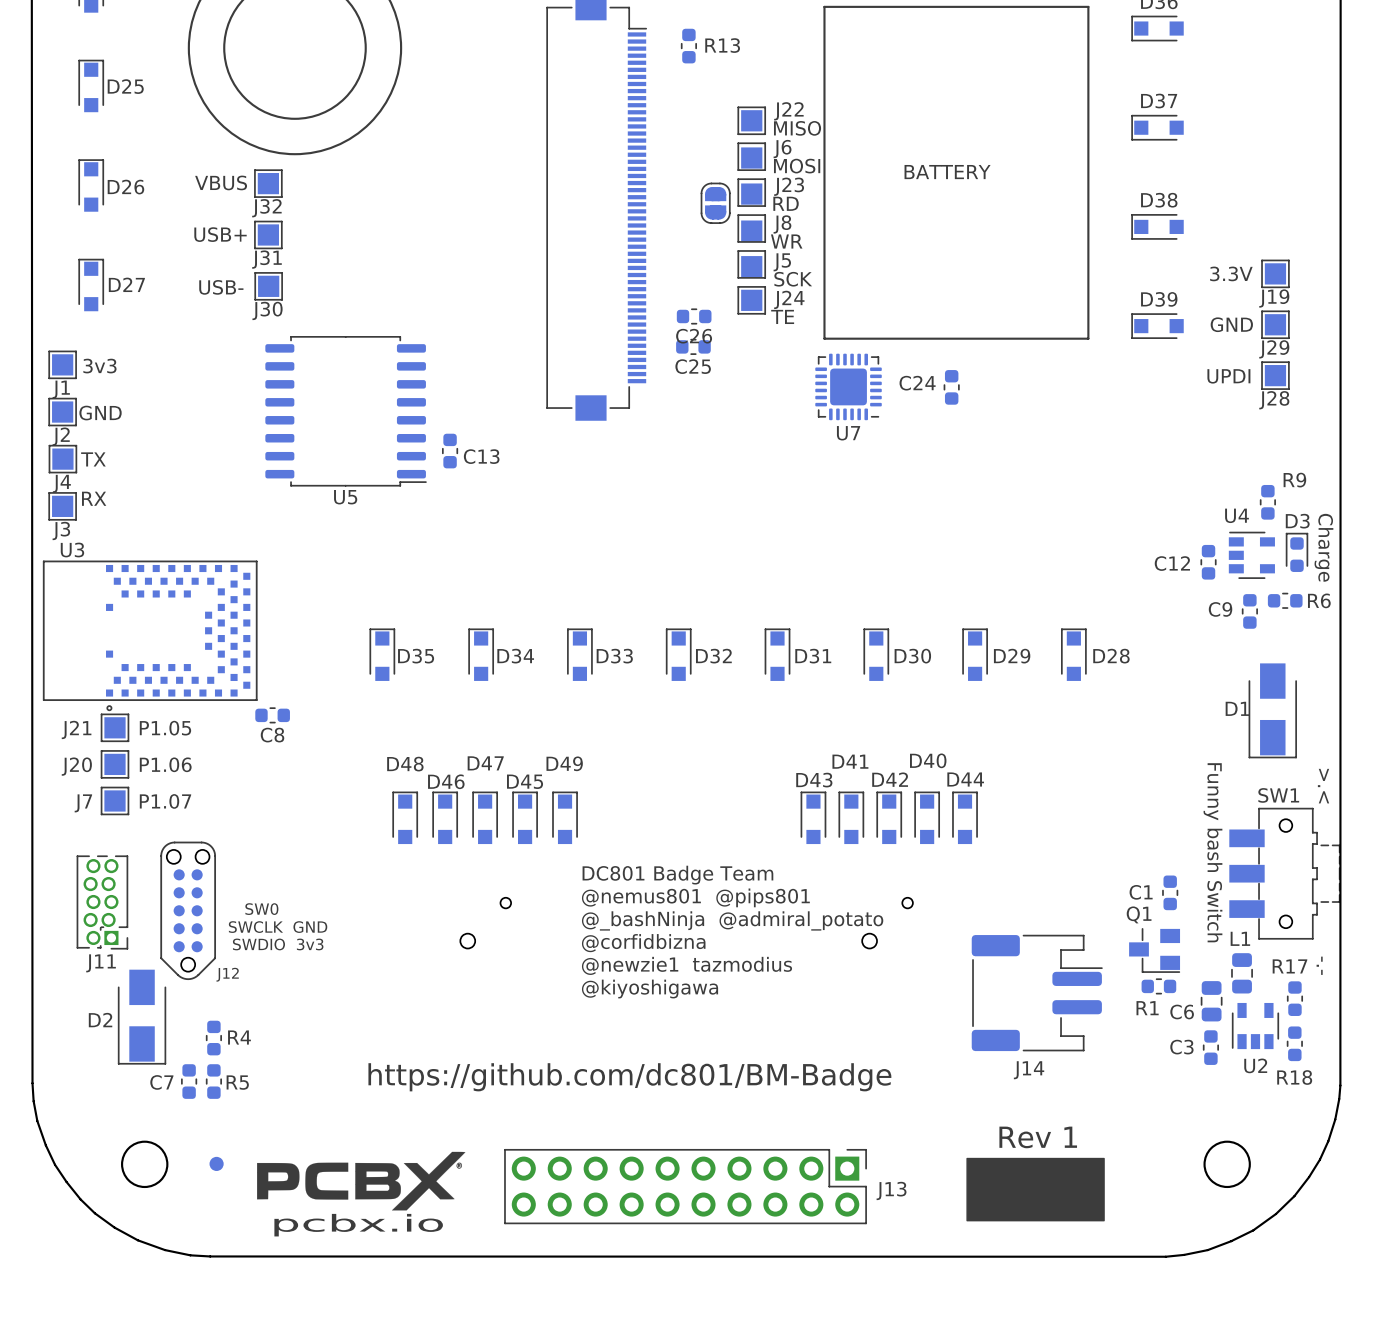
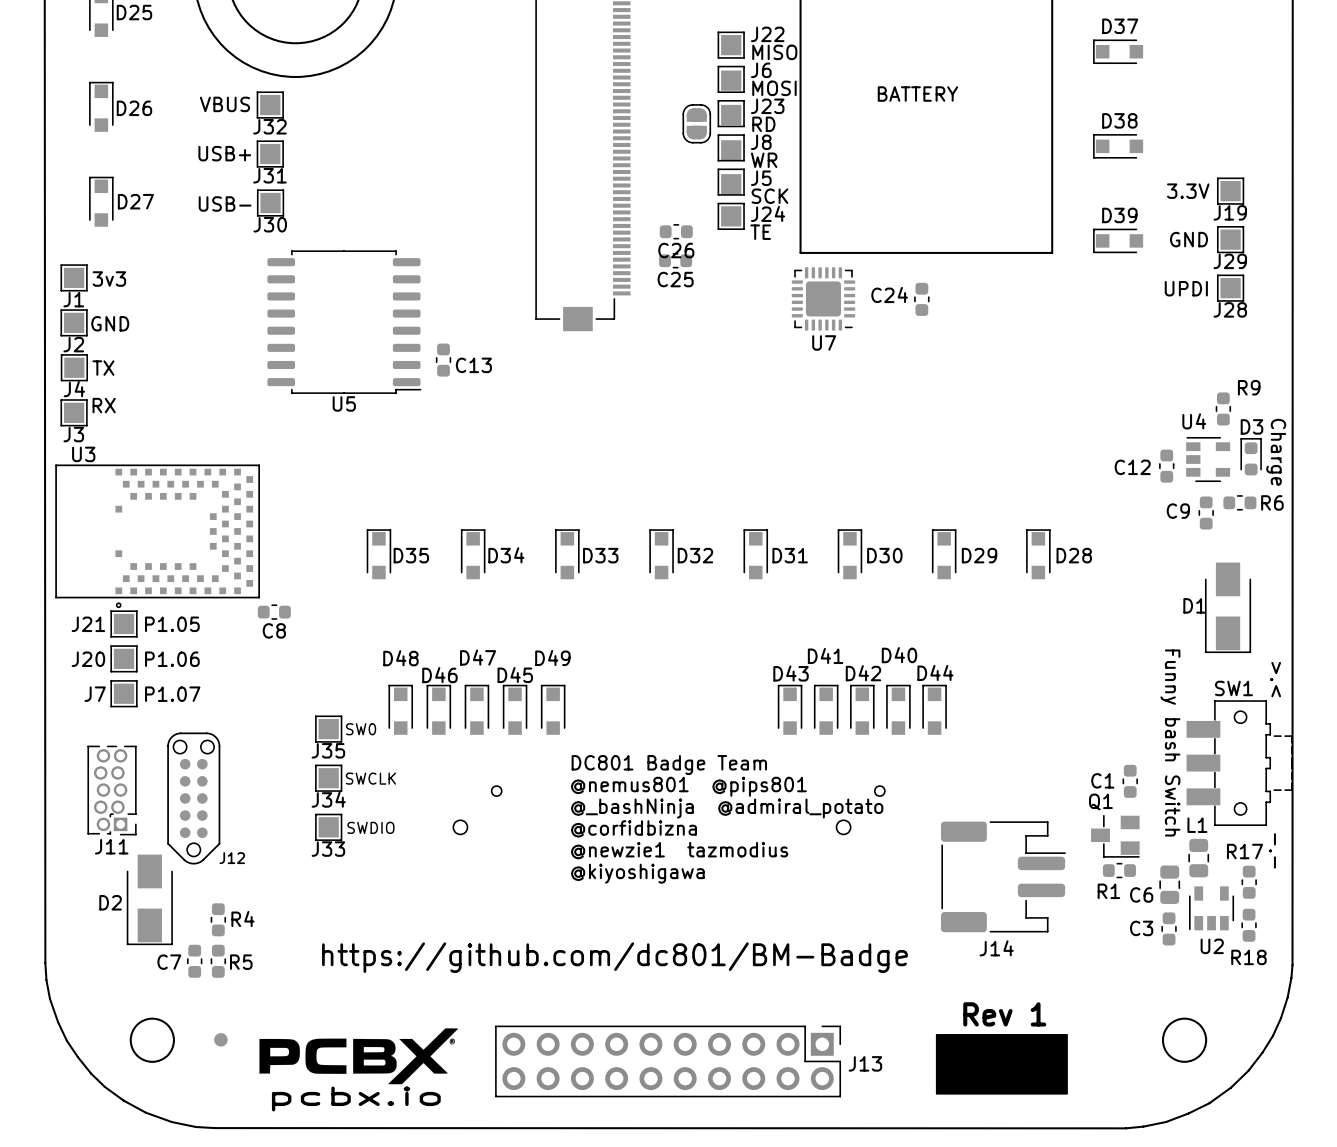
J35: none -> (328, 729)
J34: none -> (328, 778)
text: none -> SWCLK (370, 778)
text position: SW0 (261, 909) -> SW0 (361, 729)
text: SWCLK GND (278, 927) -> none
J33: none -> (328, 827)
text: none -> SWDIO (370, 827)
text: SWDIO 3v3 (278, 944) -> none

